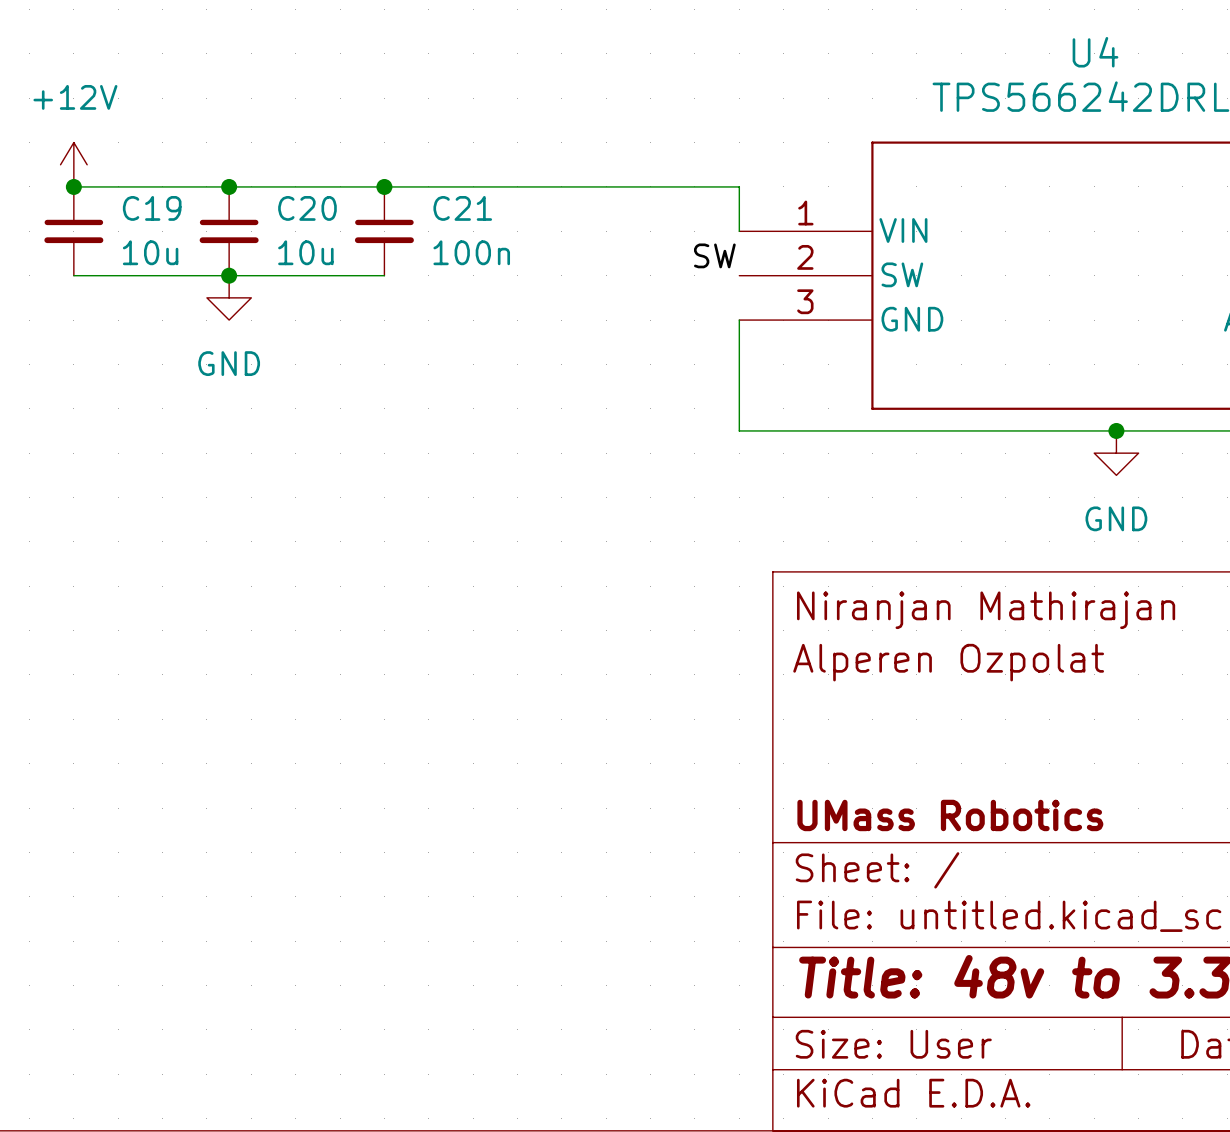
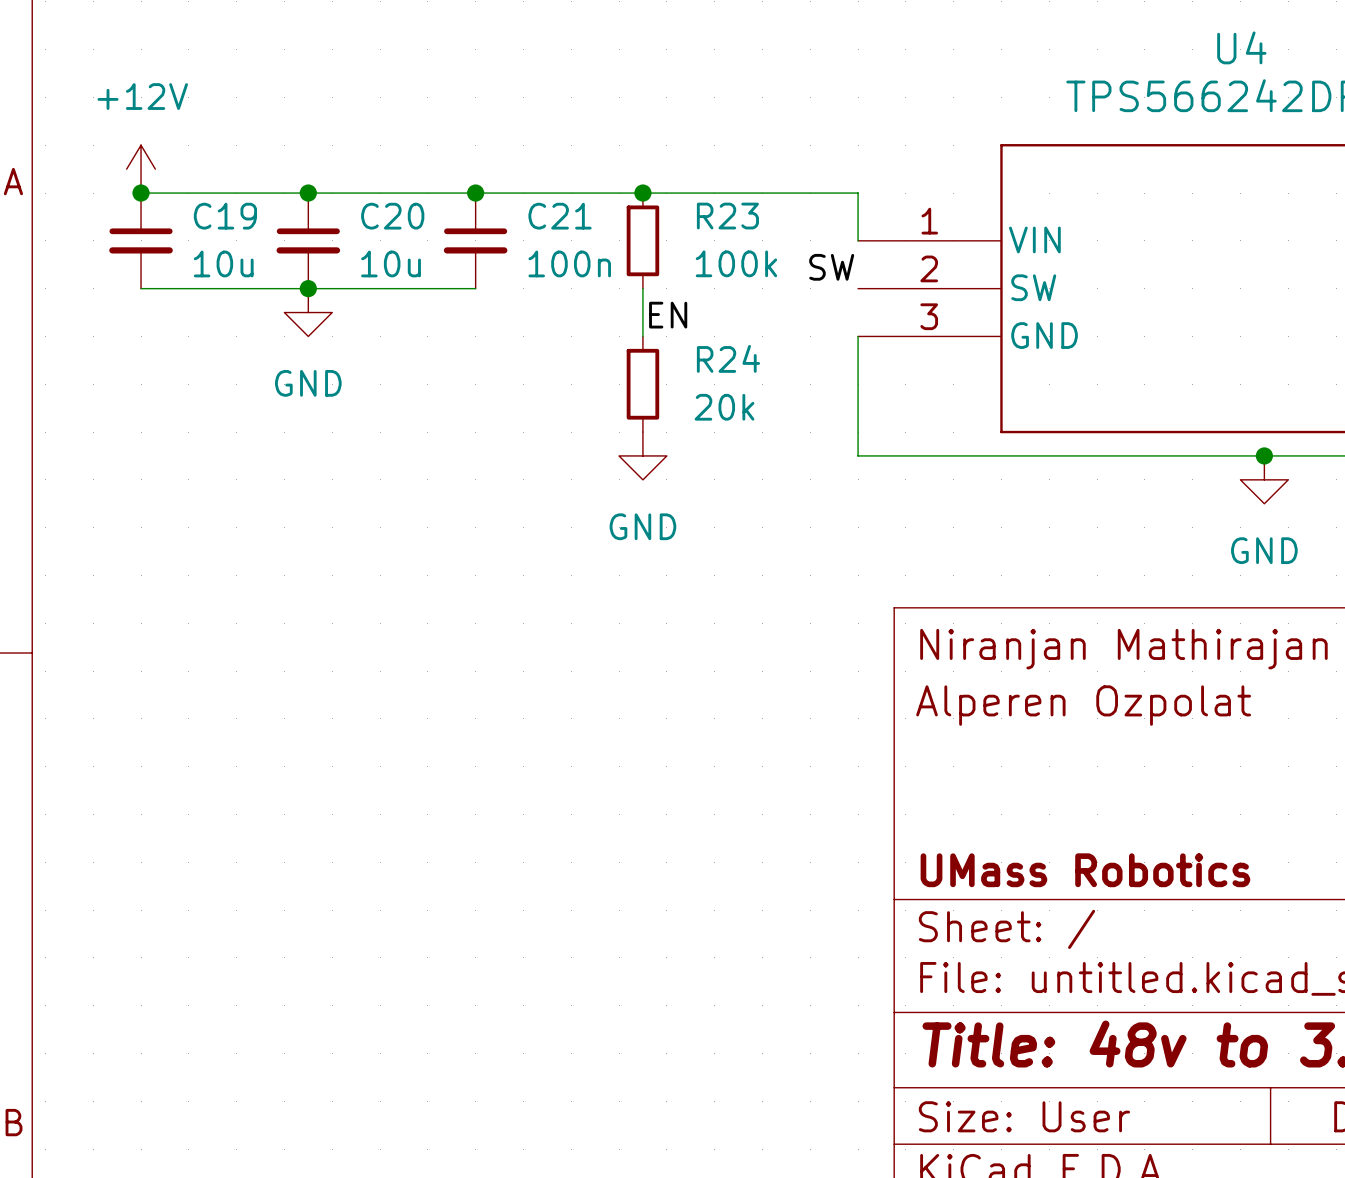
junction: none -> (642, 193)
R23: none -> 100k (642, 240)
wire: none -> (642, 288) (642, 336)
label: none -> EN (668, 315)
R24: none -> 20k (642, 384)
power symbol: none -> GND (642, 455)

